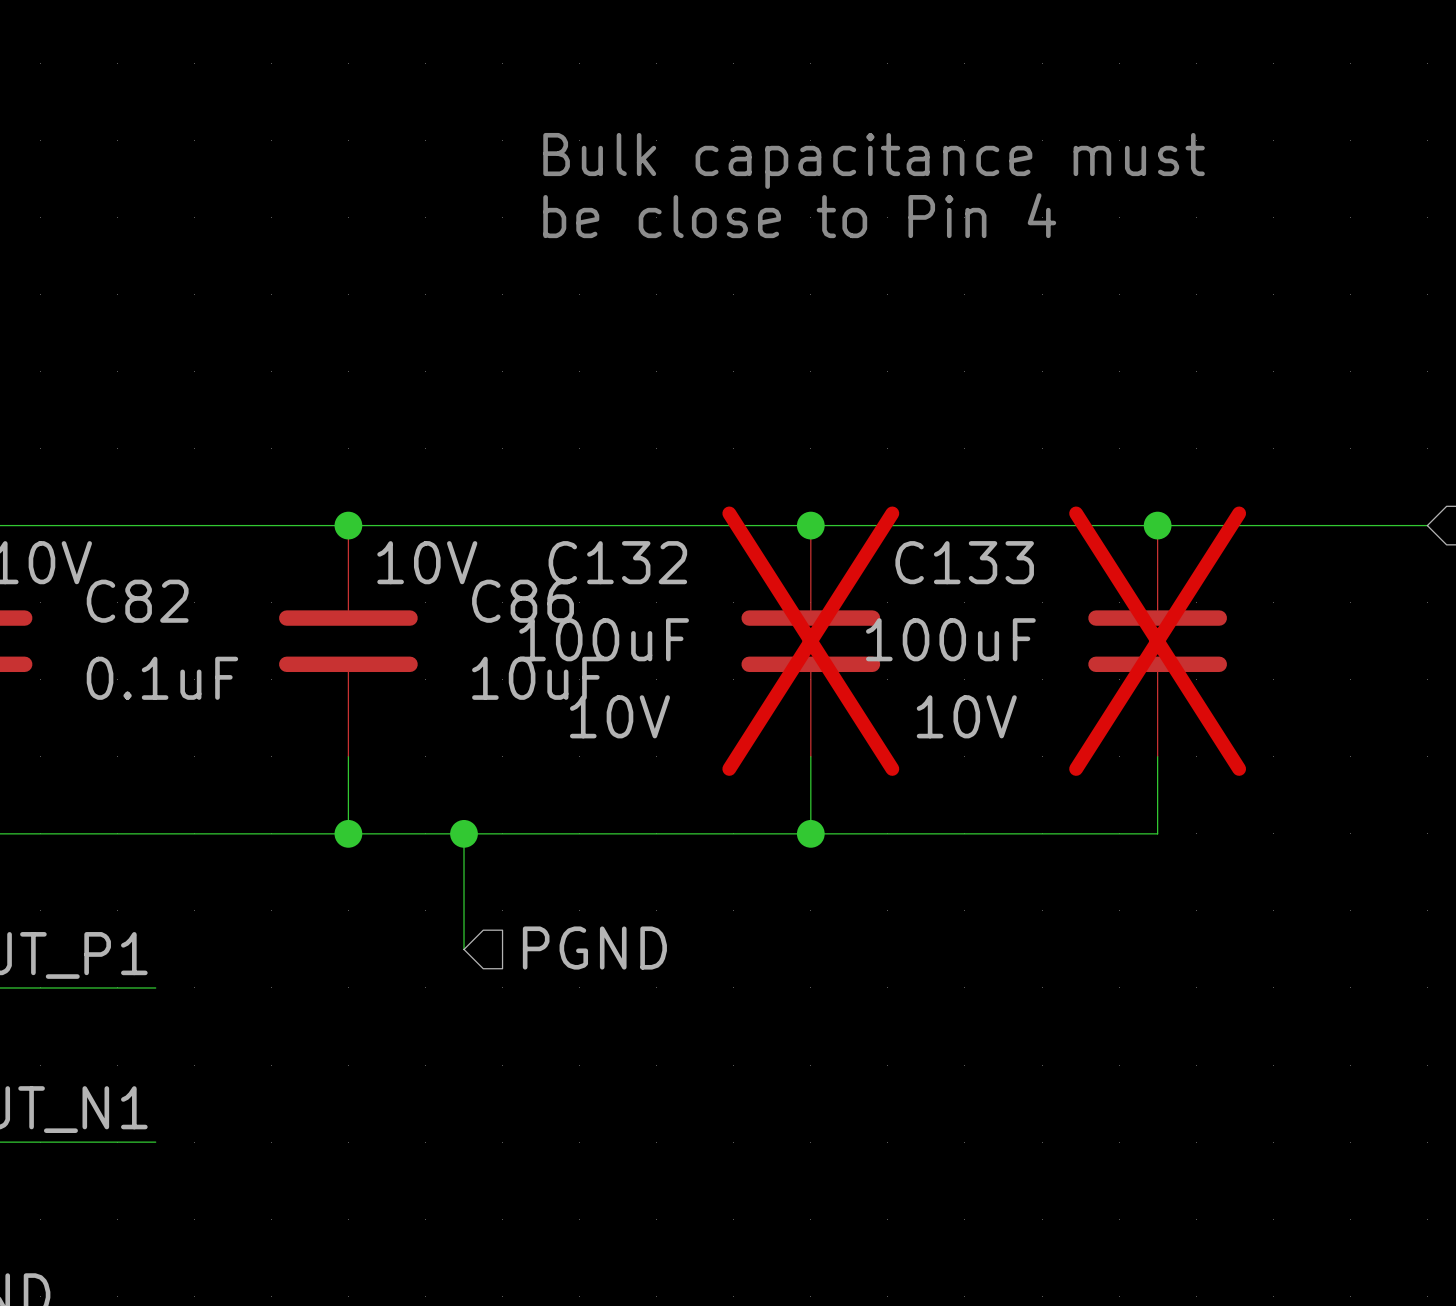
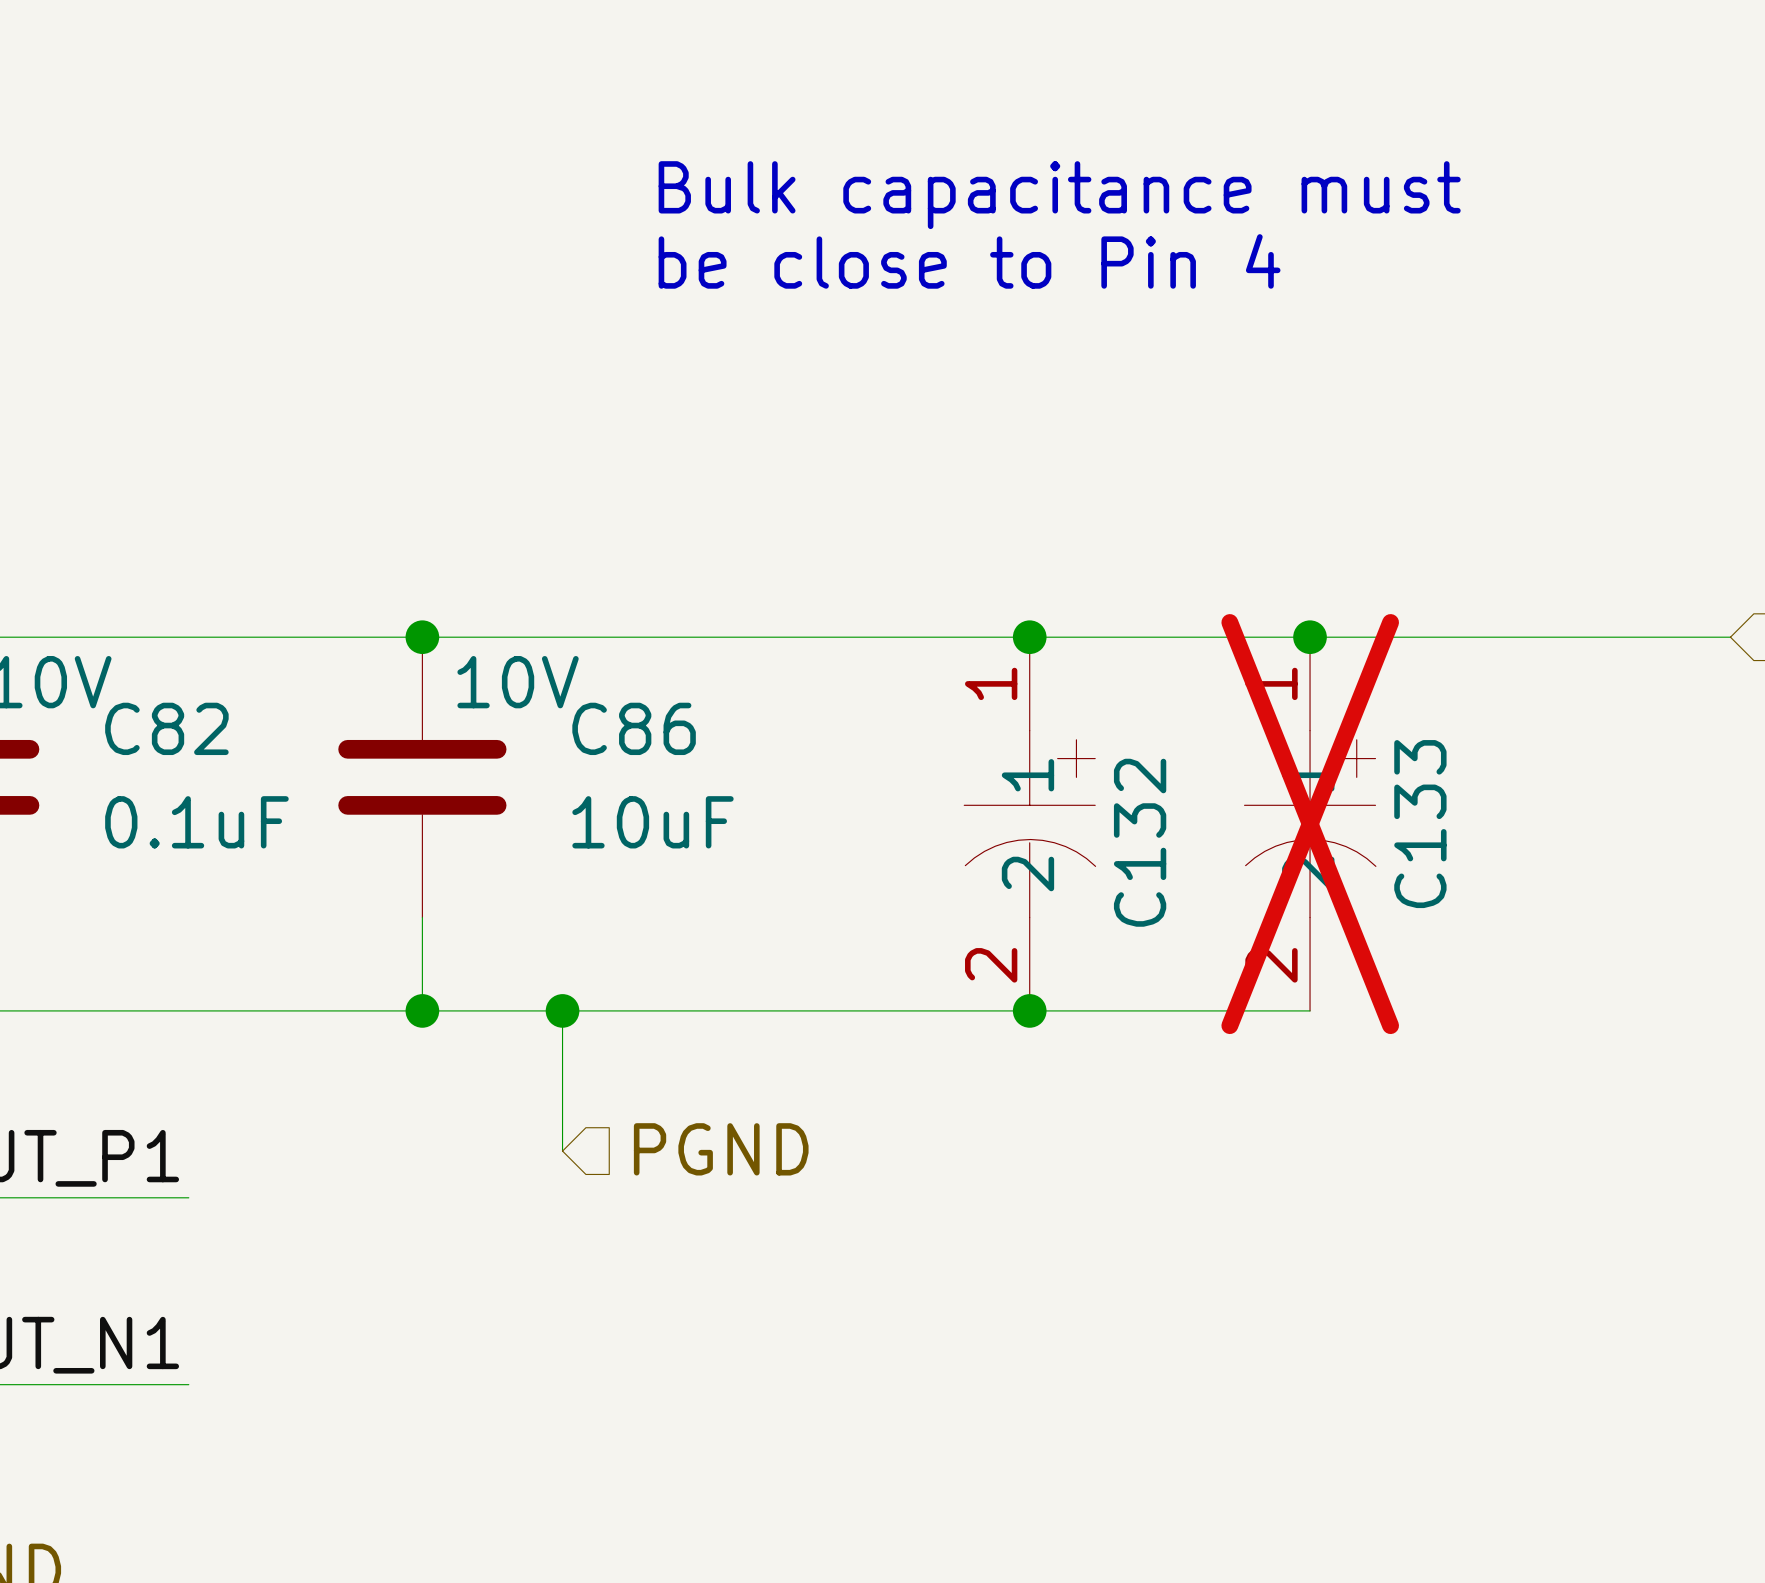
C132 symbol: [741, 525, 881, 757] -> [964, 637, 1096, 1011]
junction position: (810, 525) -> (1029, 637)
C133 symbol: [1088, 525, 1227, 757] -> [1244, 637, 1376, 1011]
junction position: (1157, 525) -> (1310, 637)
C132 name position: C132 (617, 562) -> C132 (1140, 842)
C133 name position: C133 (964, 562) -> C133 (1420, 824)
C132 value: 100uF (604, 639) -> none
C133 value: 100uF (950, 639) -> none
C132 do-not-place cross: (810, 641) -> none
C132 text: 10V (619, 716) -> none
C133 text: 10V (966, 716) -> none
wire: (810, 756) (810, 833) -> none
wire: (1157, 756) (1157, 833) (1080, 833) -> none
junction position: (810, 833) -> (1029, 1010)

